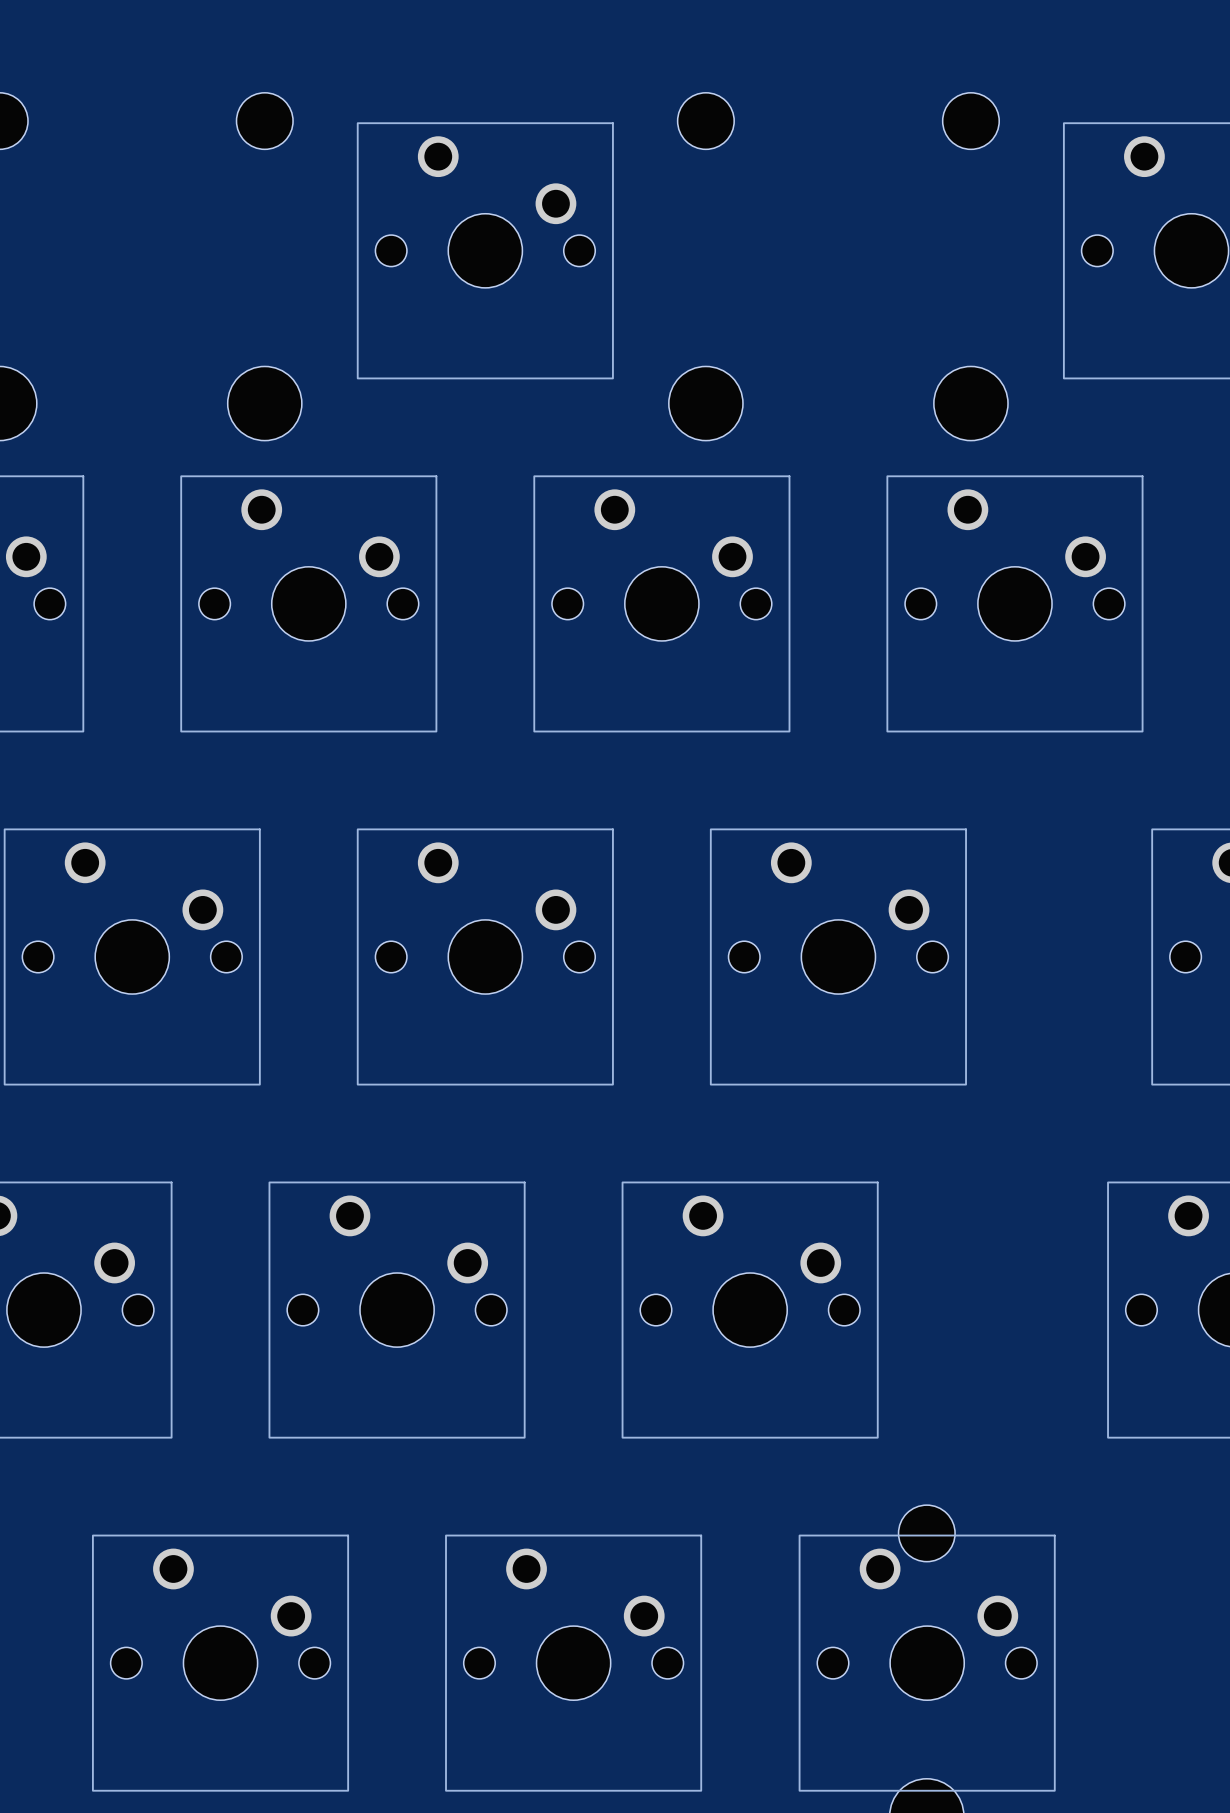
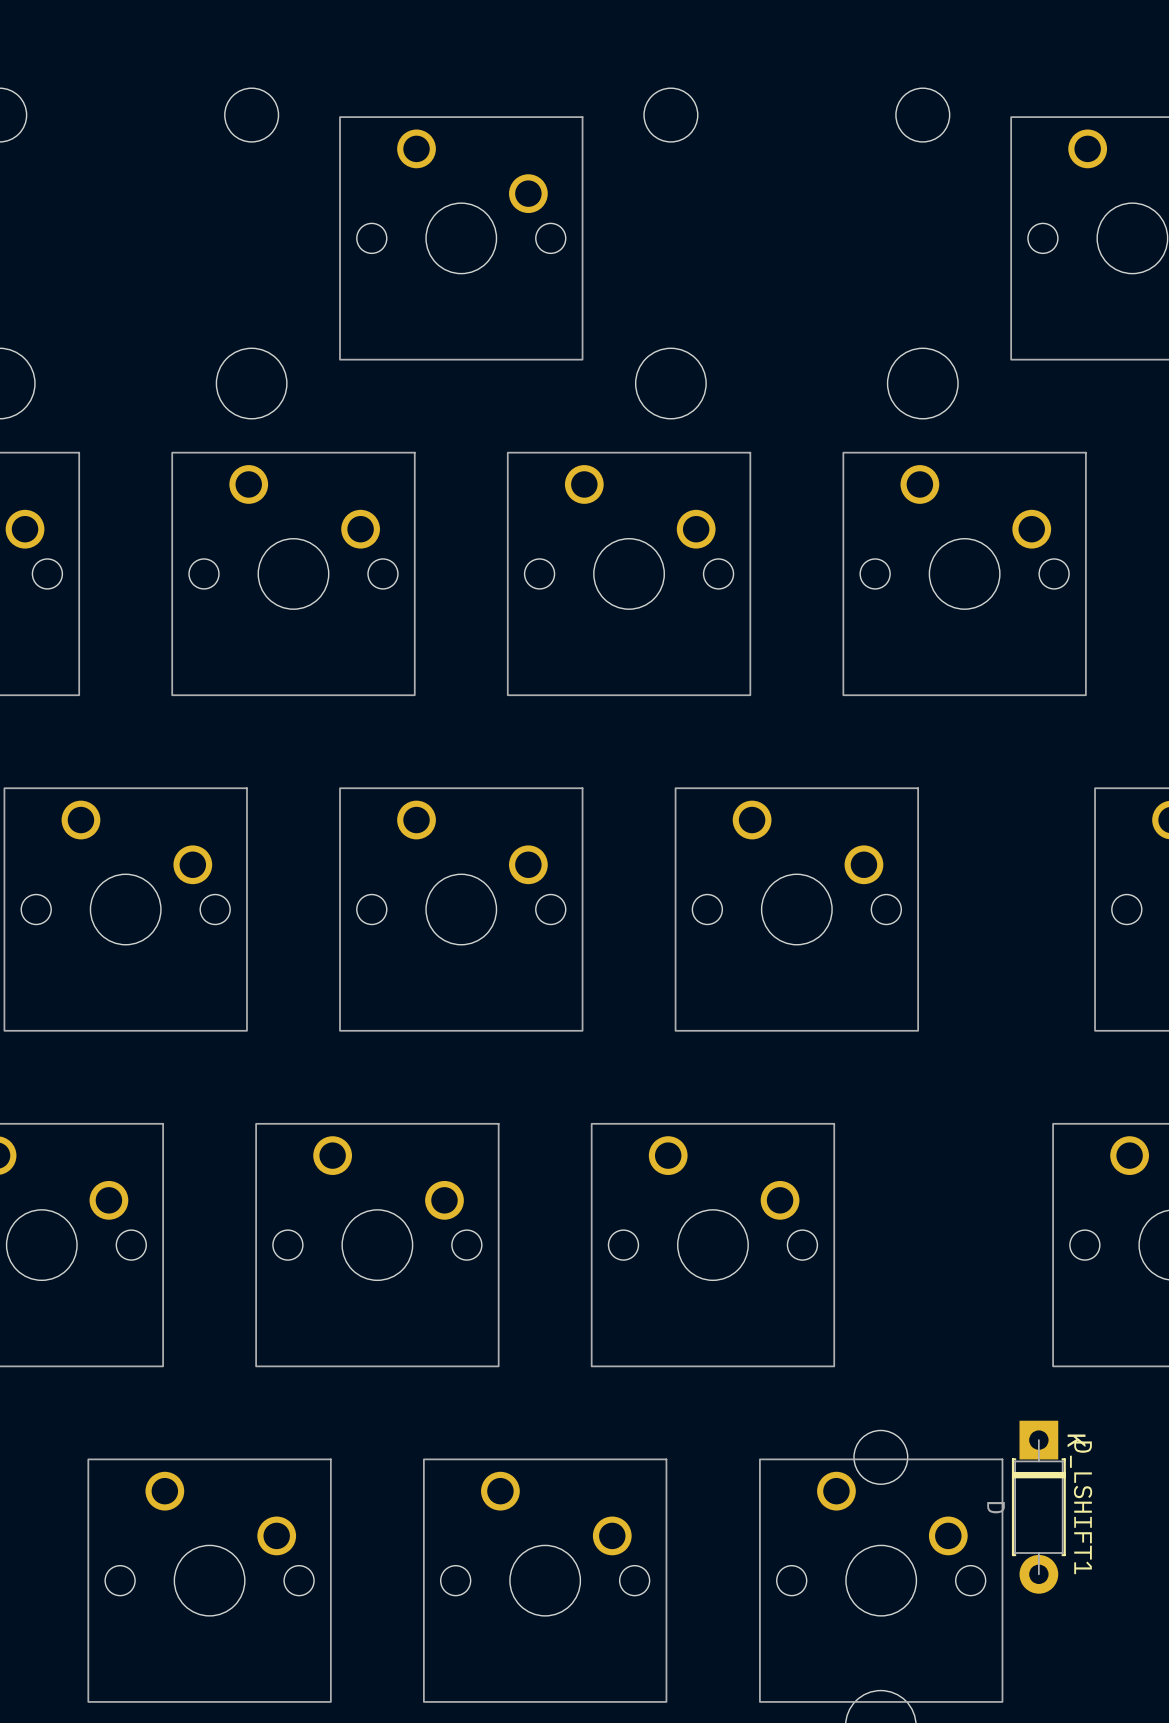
D_LSHIFT1: none -> D (1038, 1507)

